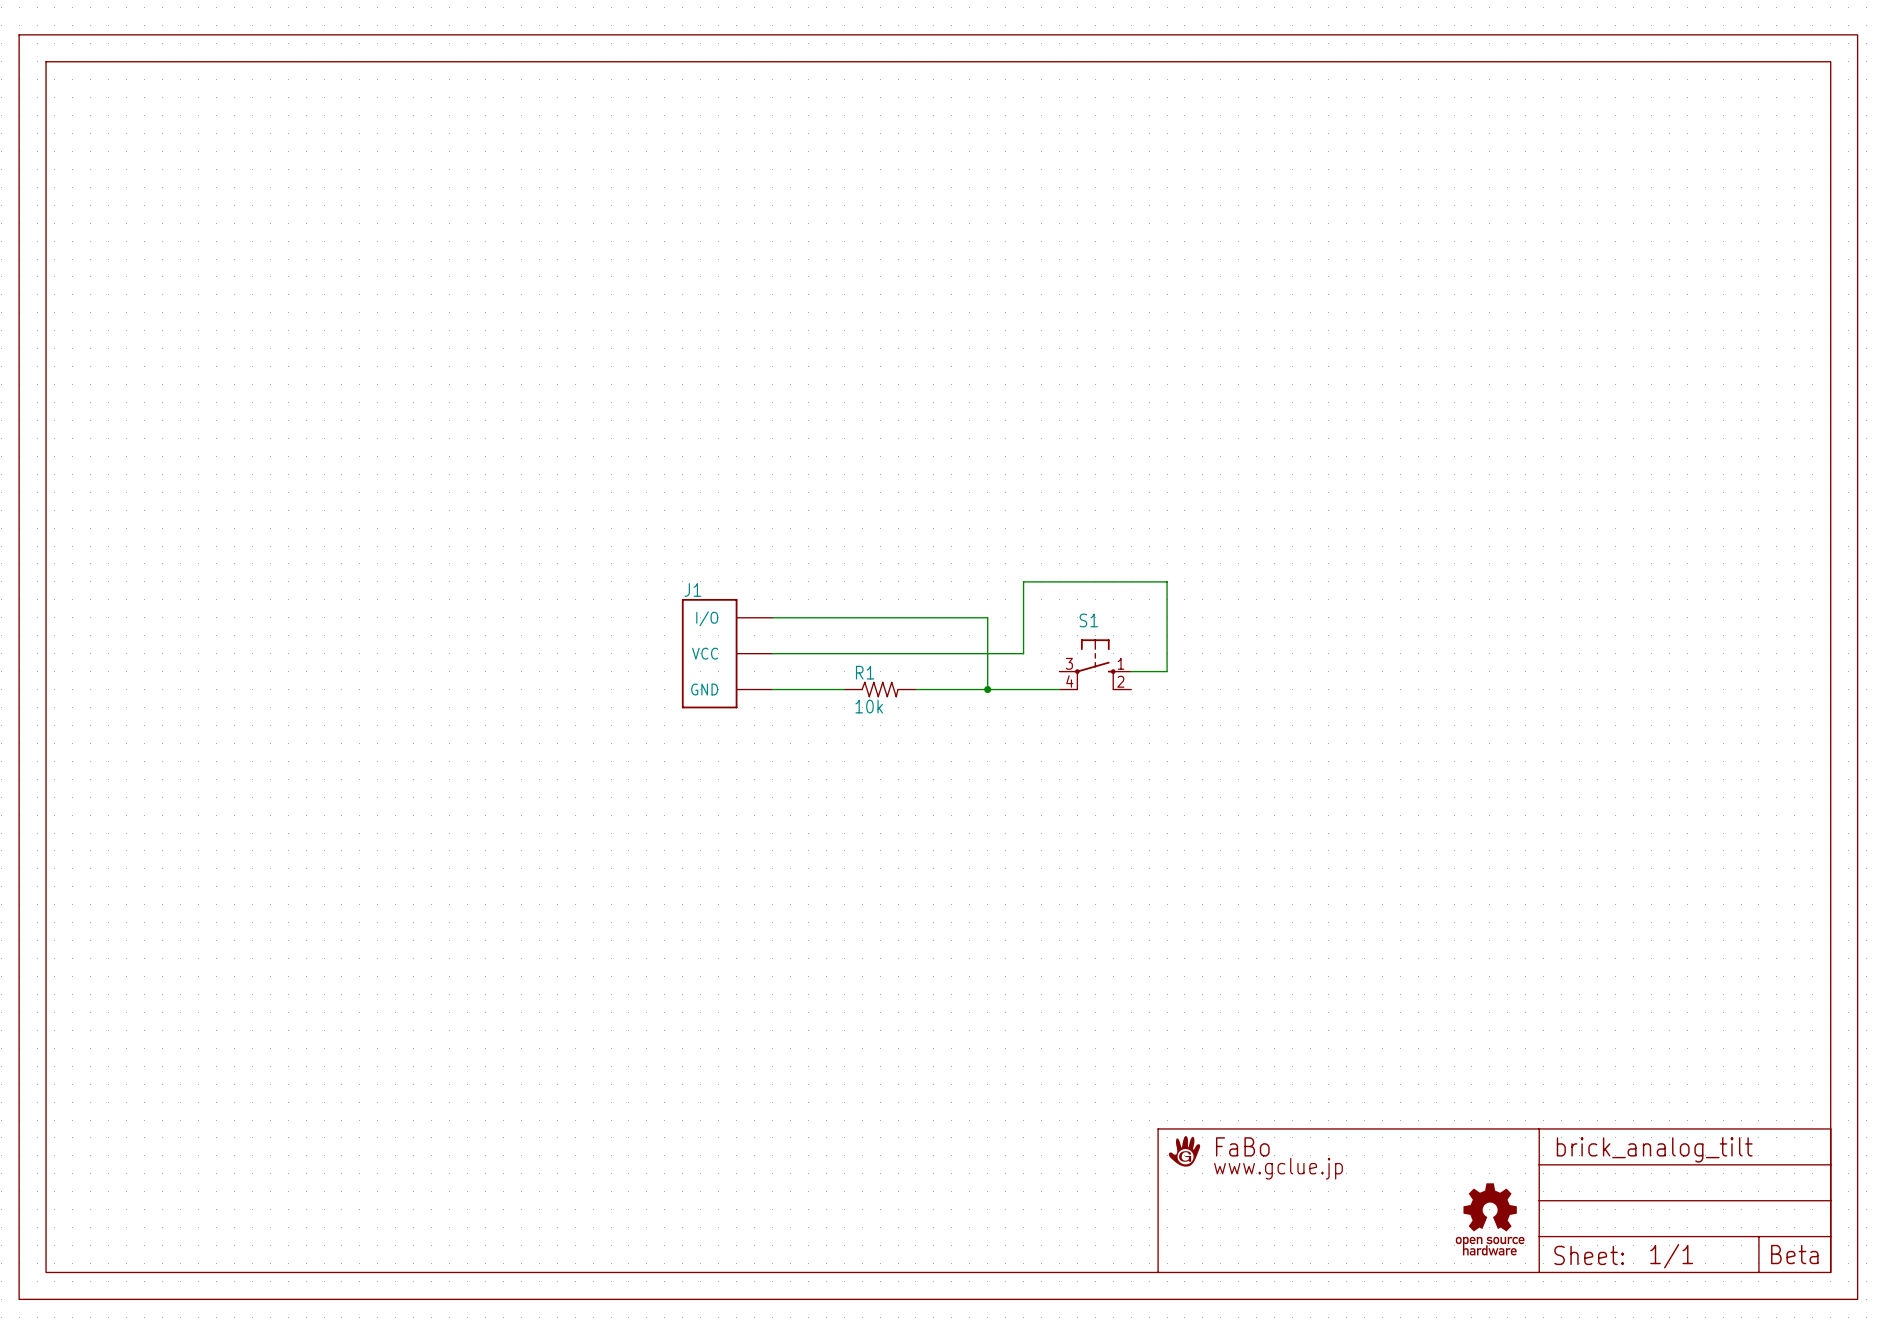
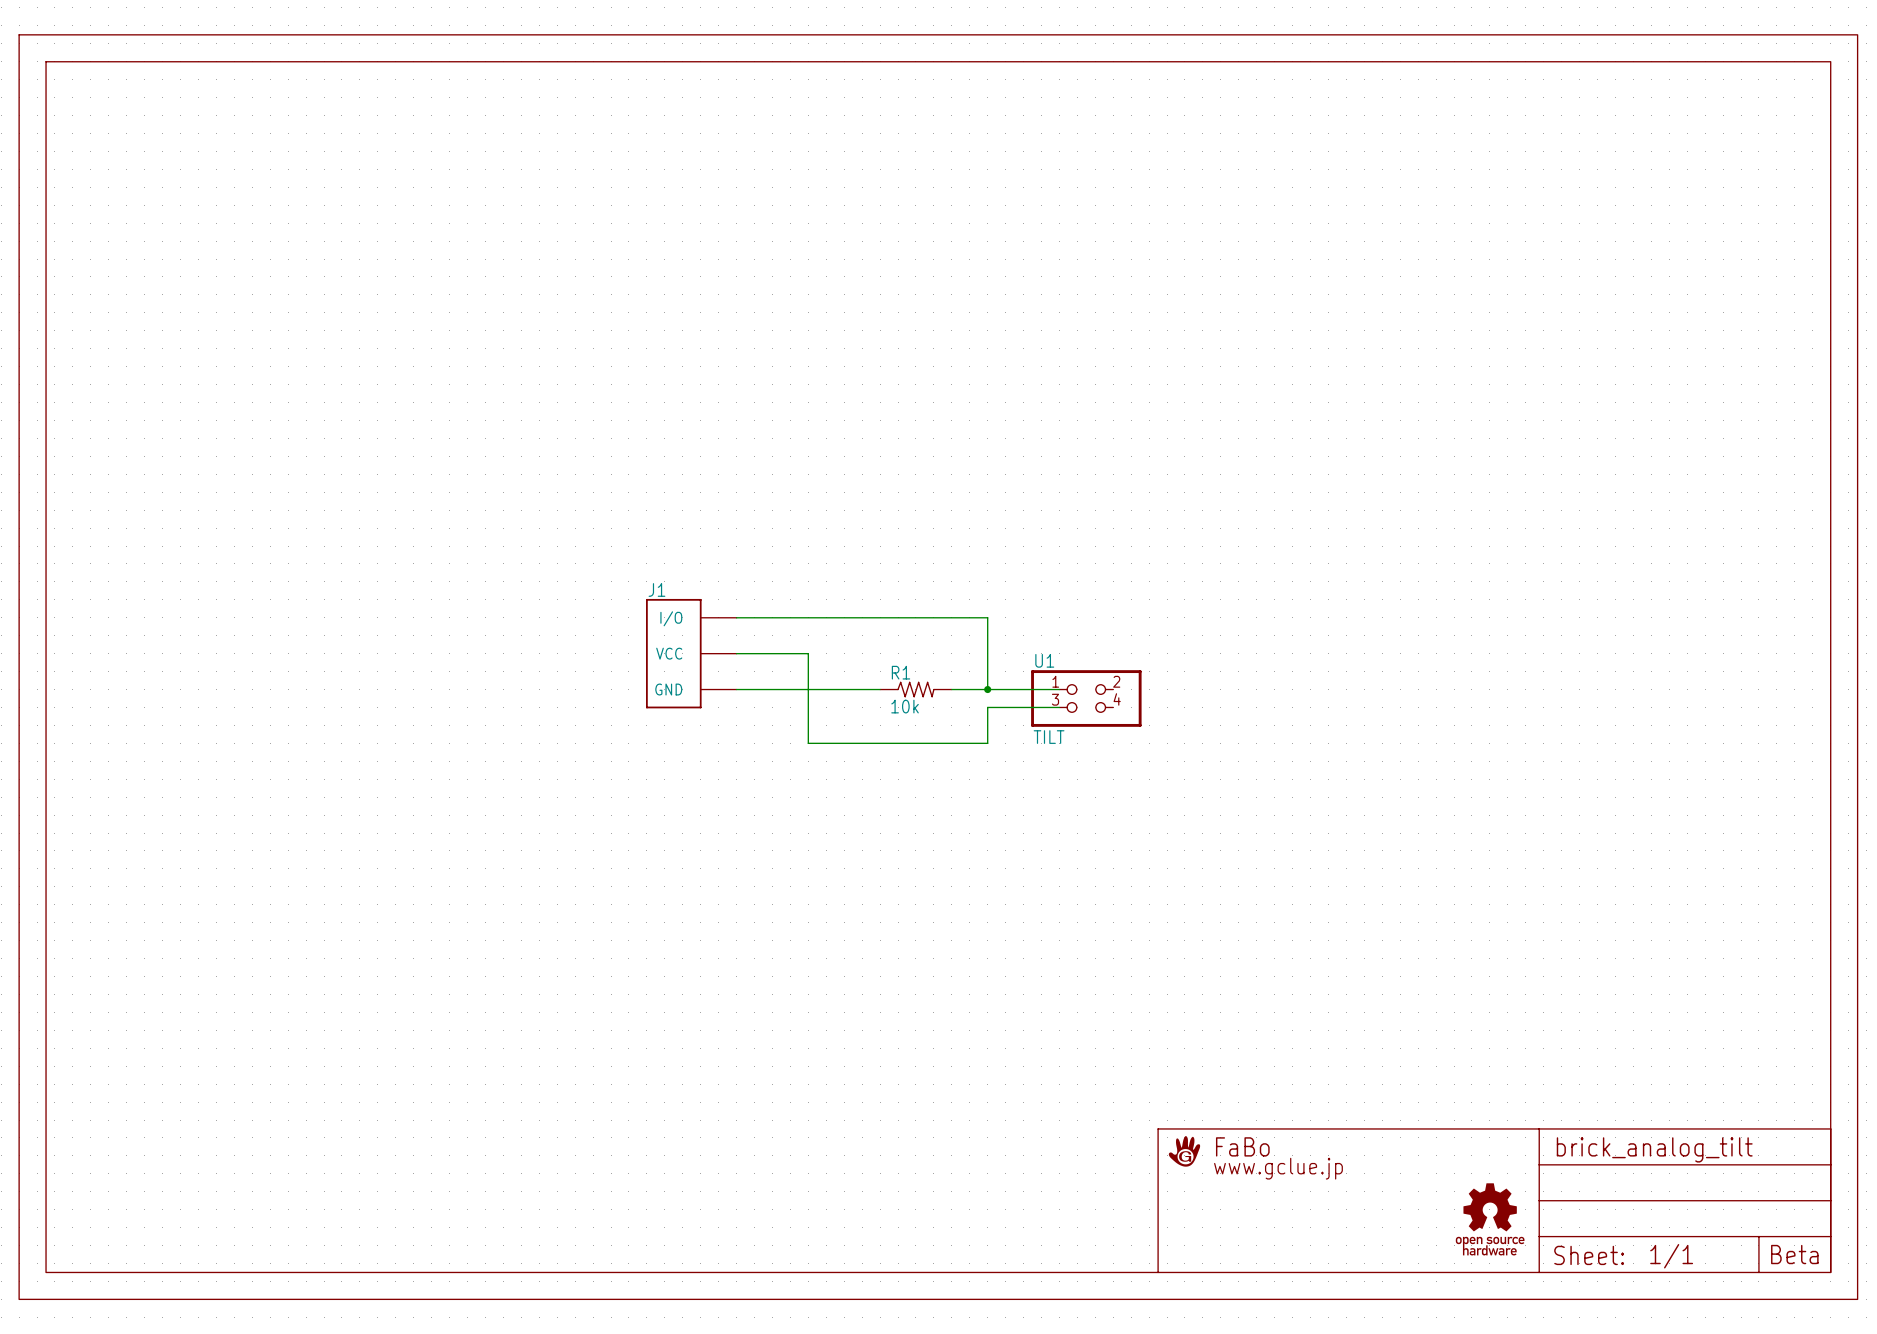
J1 position: (727, 653) -> (691, 653)
wire: (808, 653) (1023, 653) (1023, 581) (1167, 581) (1167, 671) (1131, 671) -> (808, 653) (808, 743) (987, 743) (987, 707) (1059, 707)
S1: (1095, 664) -> none
R1 position: (880, 689) -> (915, 689)
U1: none -> TILT (1086, 698)

